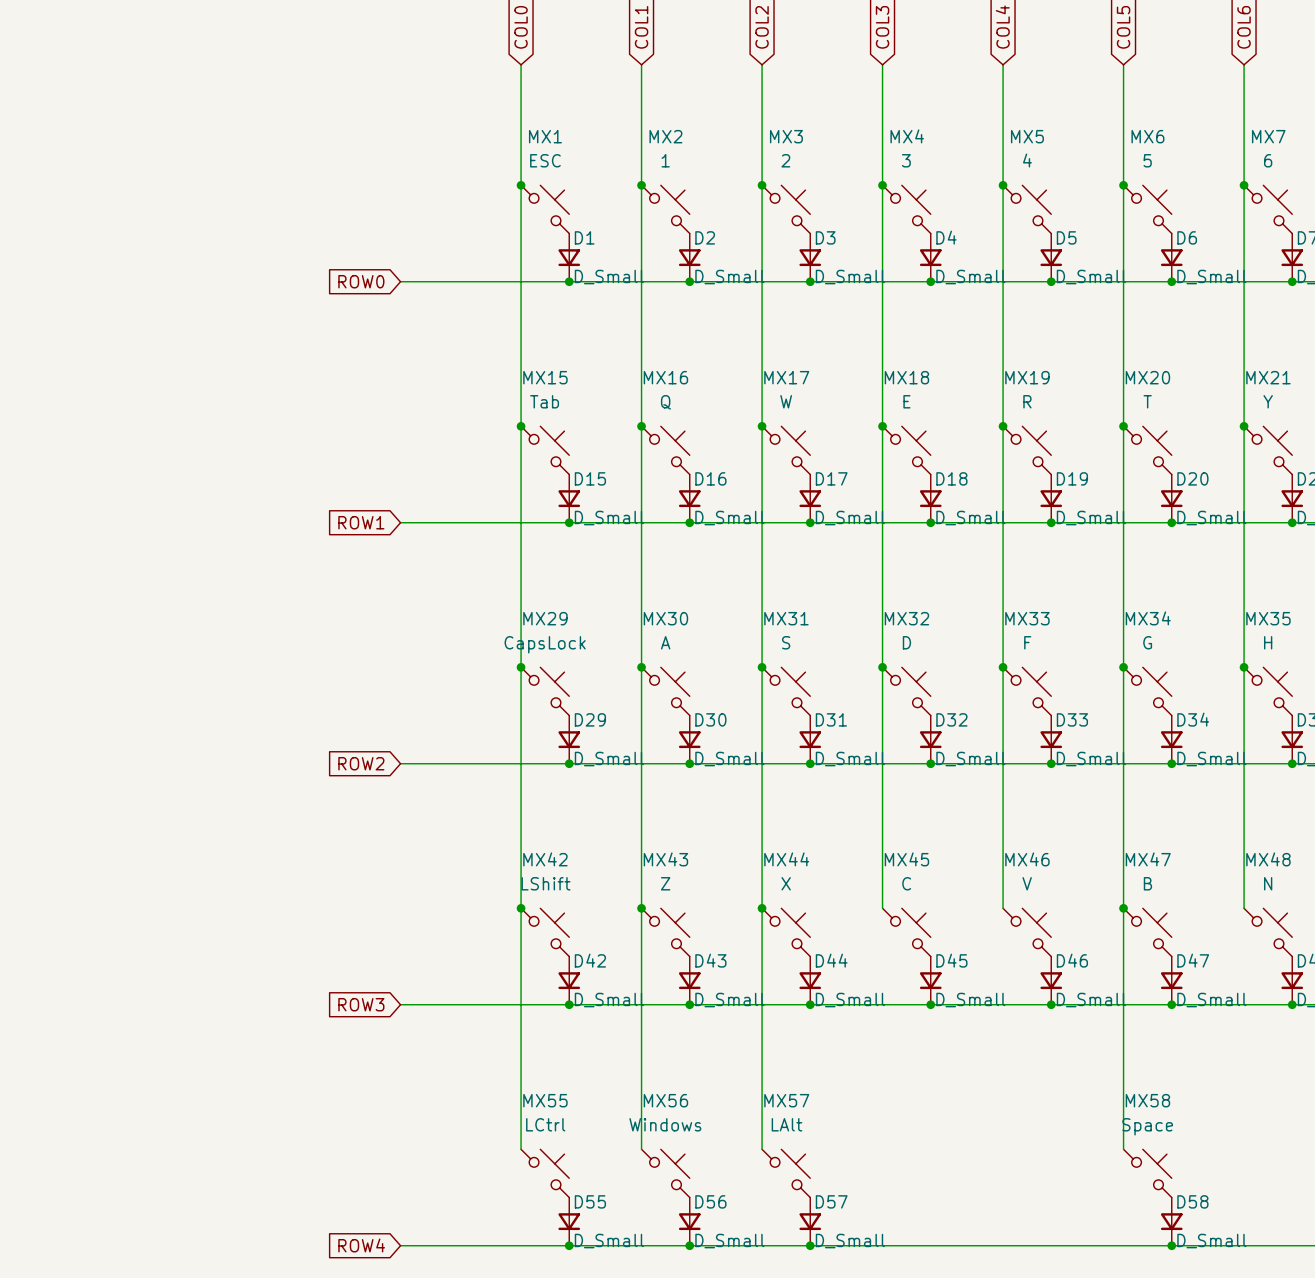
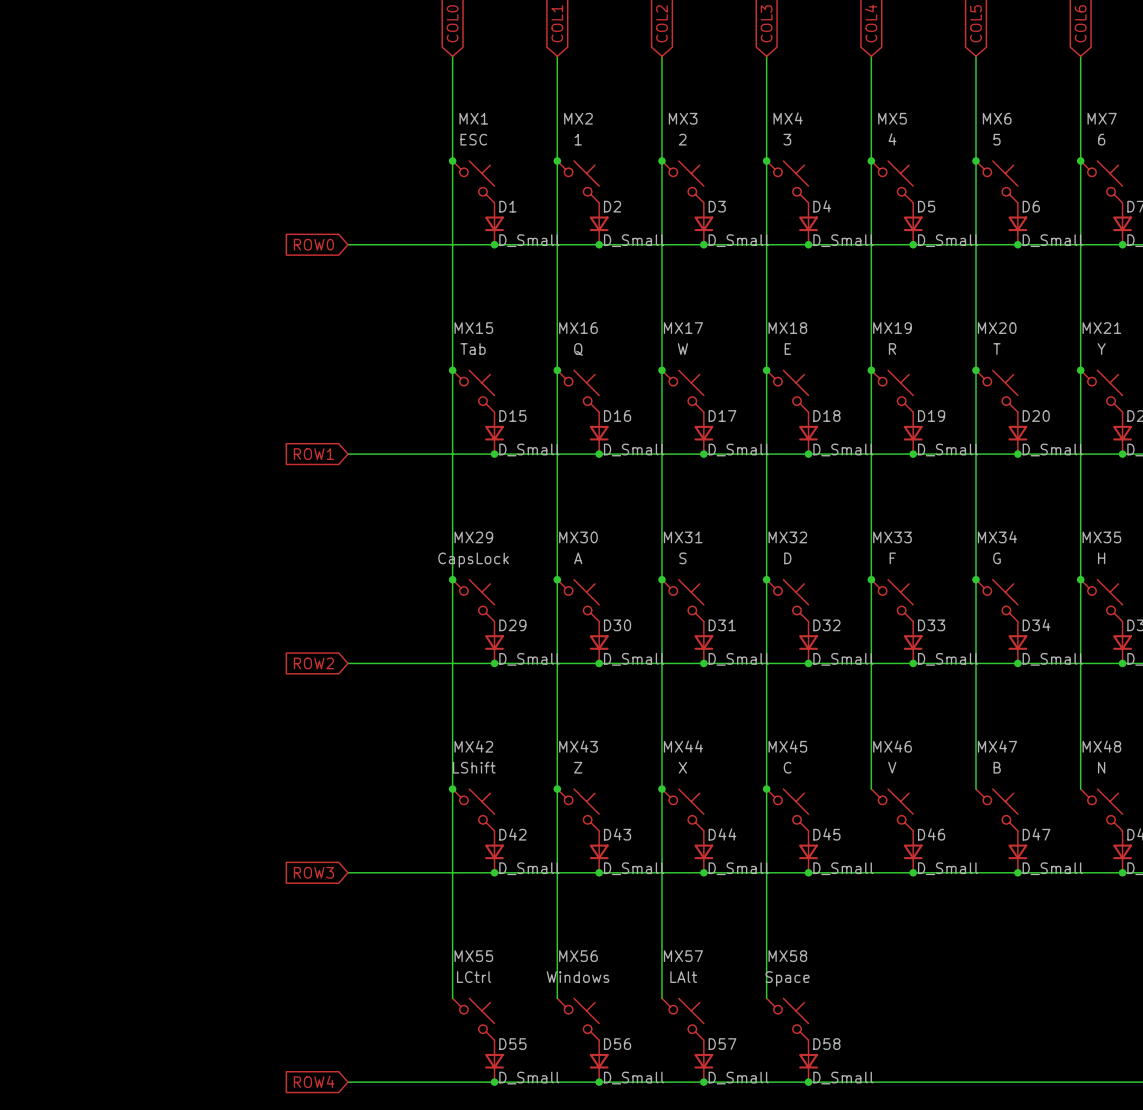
wire: none -> (766, 789) (766, 998)
junction: none -> (766, 789)
wire: (1123, 908) (1123, 1149) -> none
junction: (1123, 908) -> none
MX58 position: (1147, 1173) -> (787, 1019)
D58 position: (1171, 1221) -> (808, 1061)
junction: none -> (808, 1082)
junction: (1171, 1245) -> none

